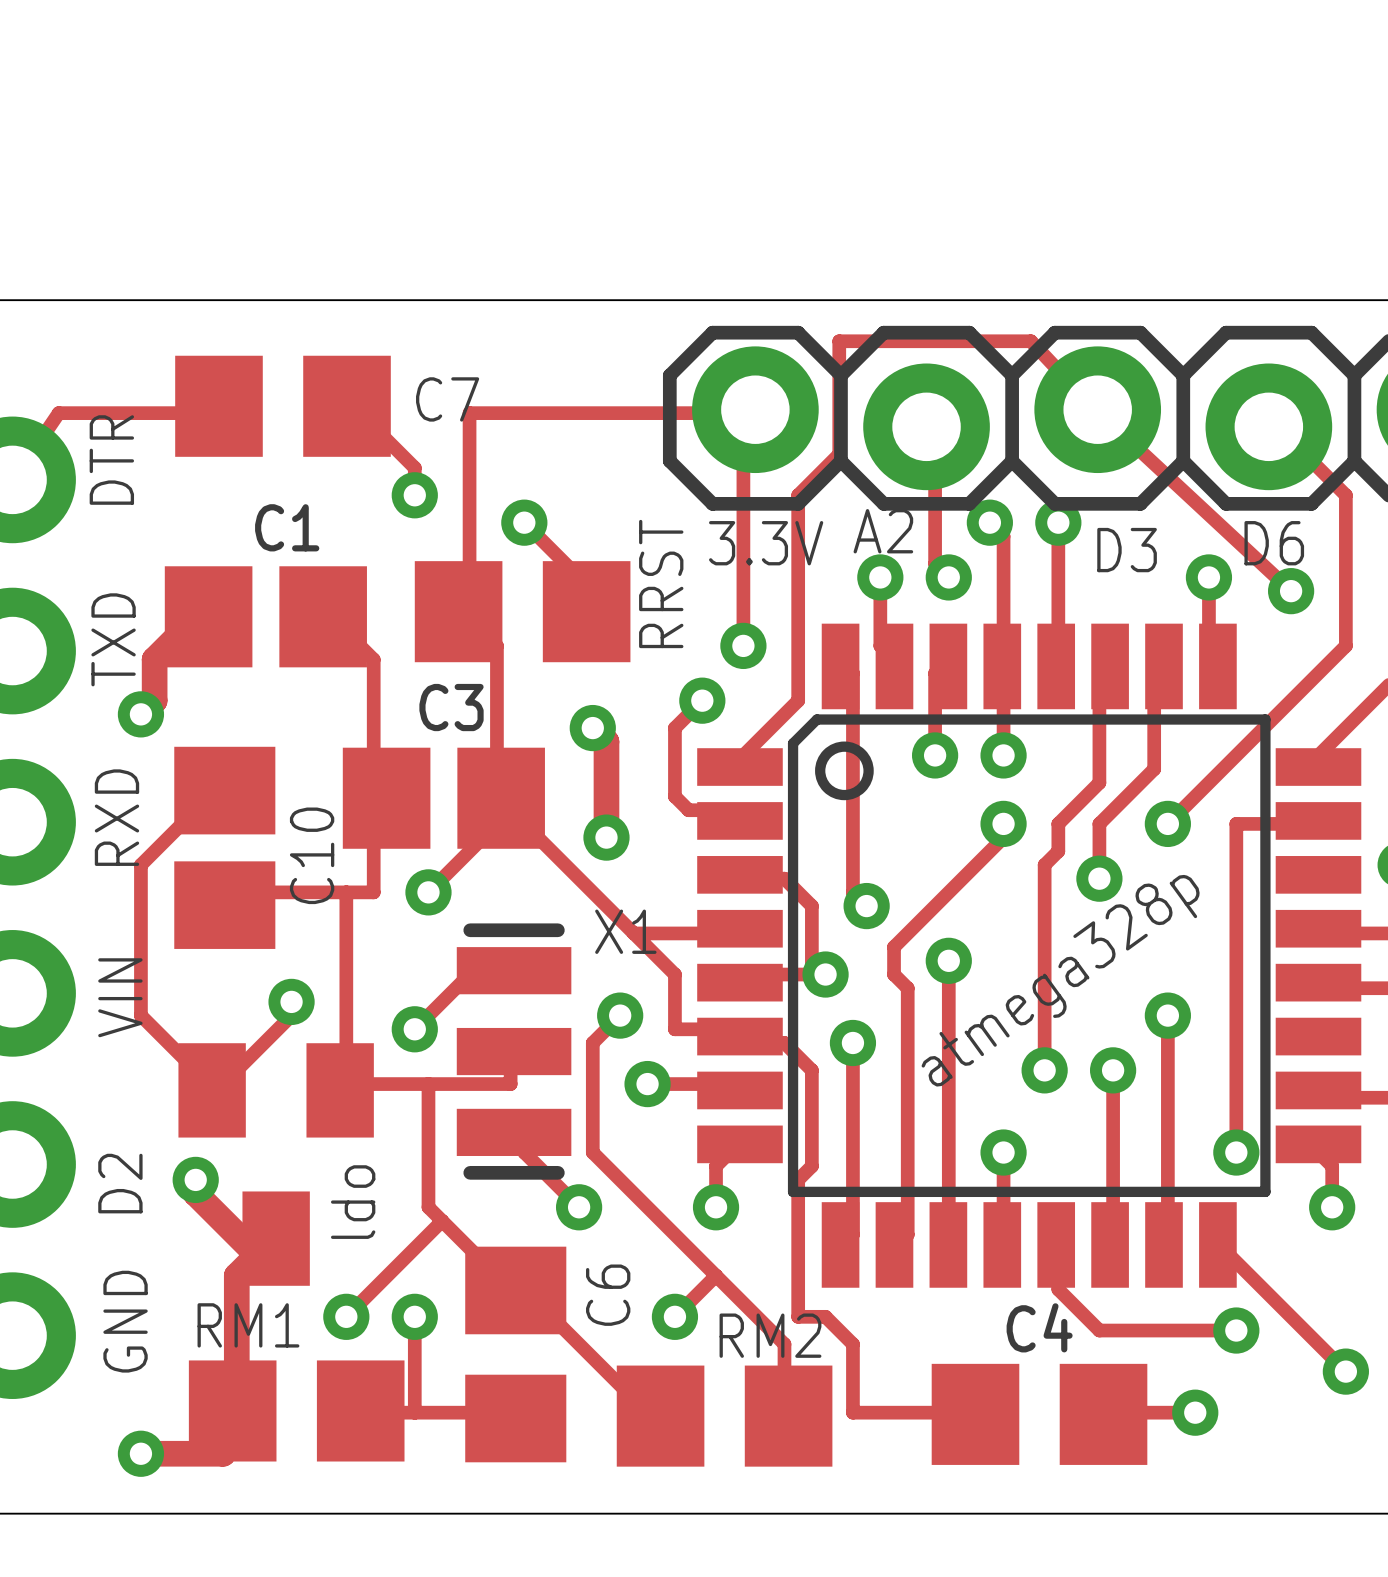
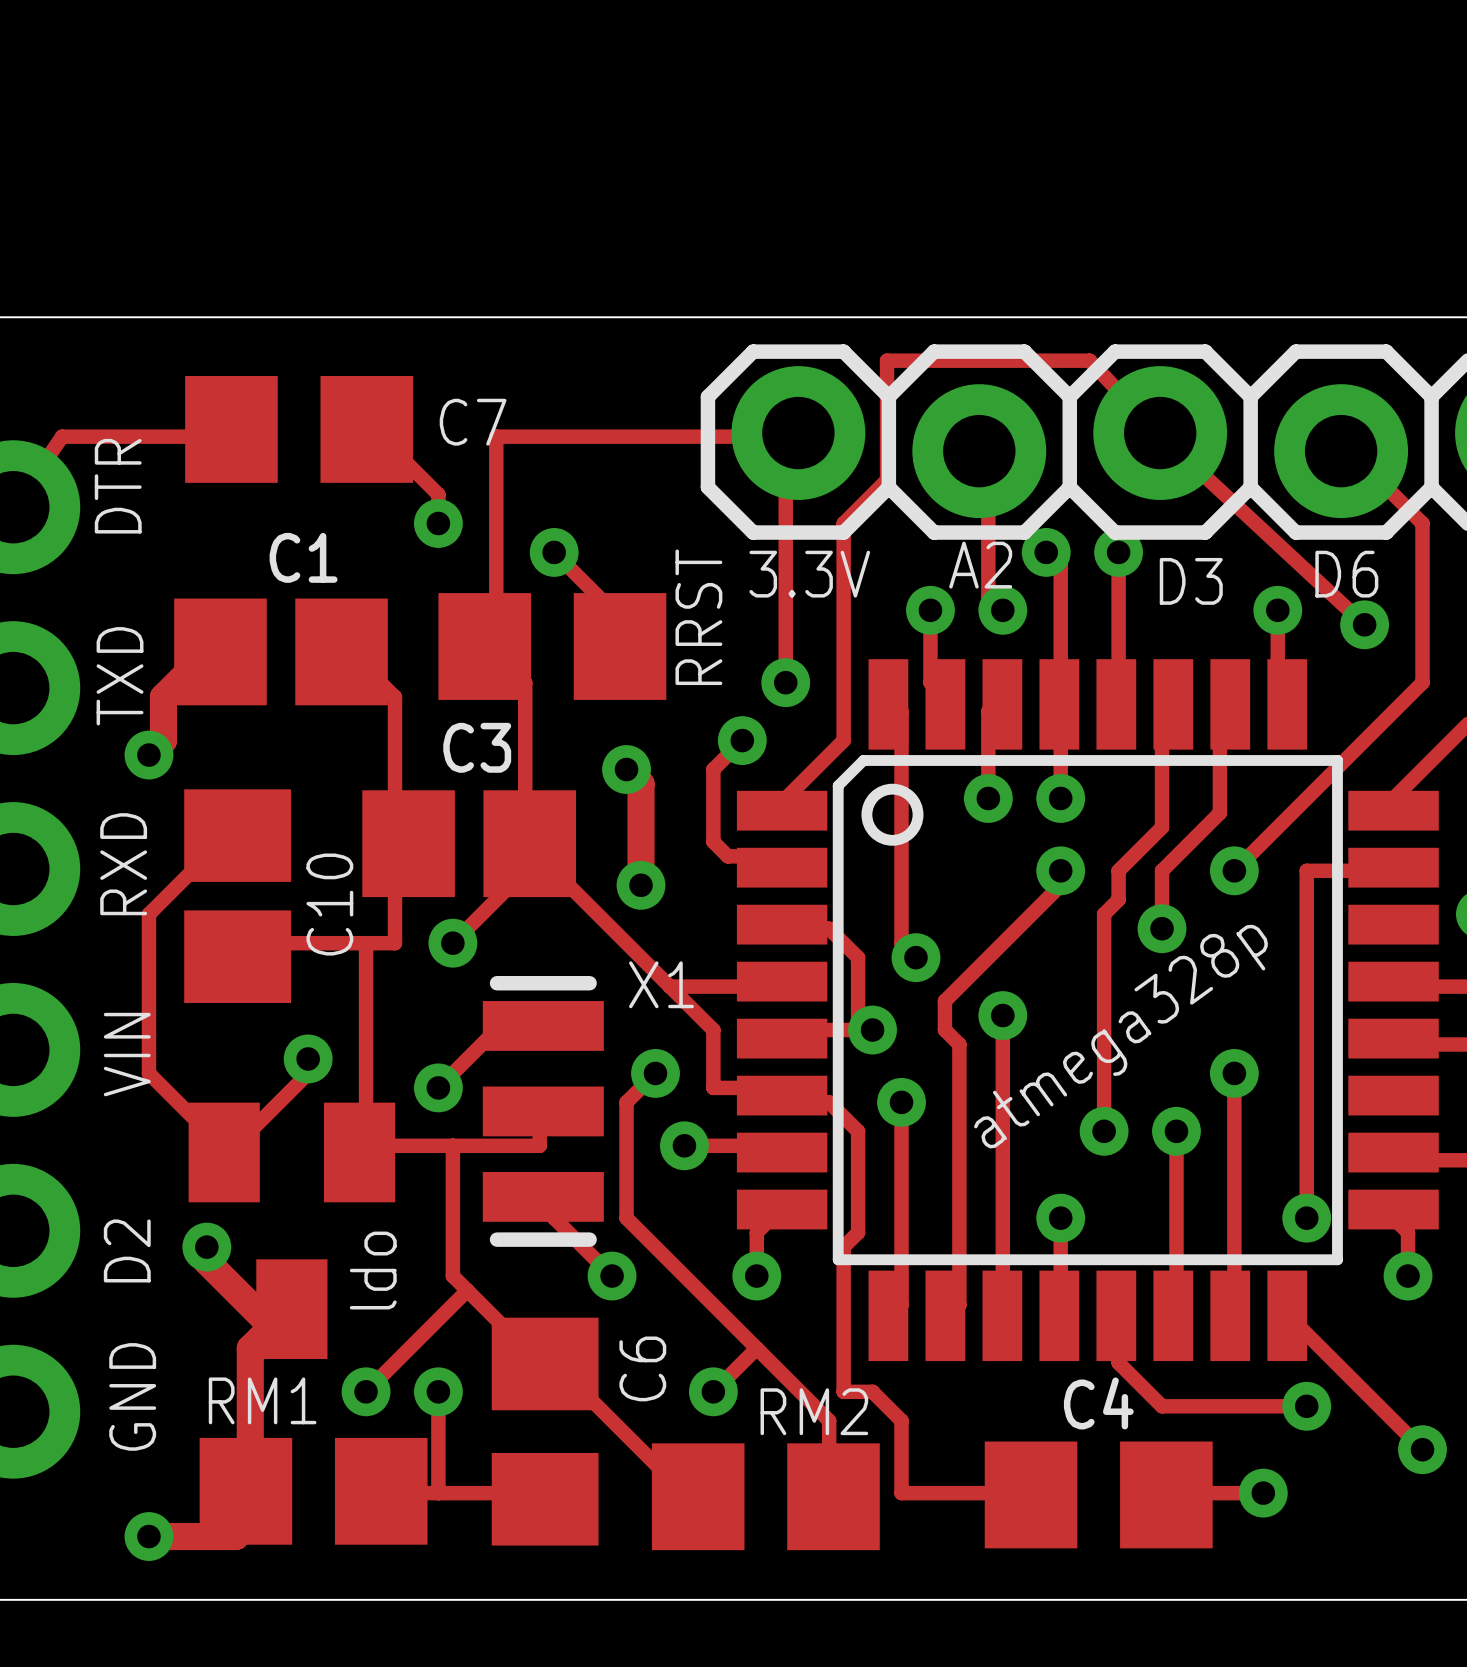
text position: A2 (883, 531) -> A2 (980, 565)

